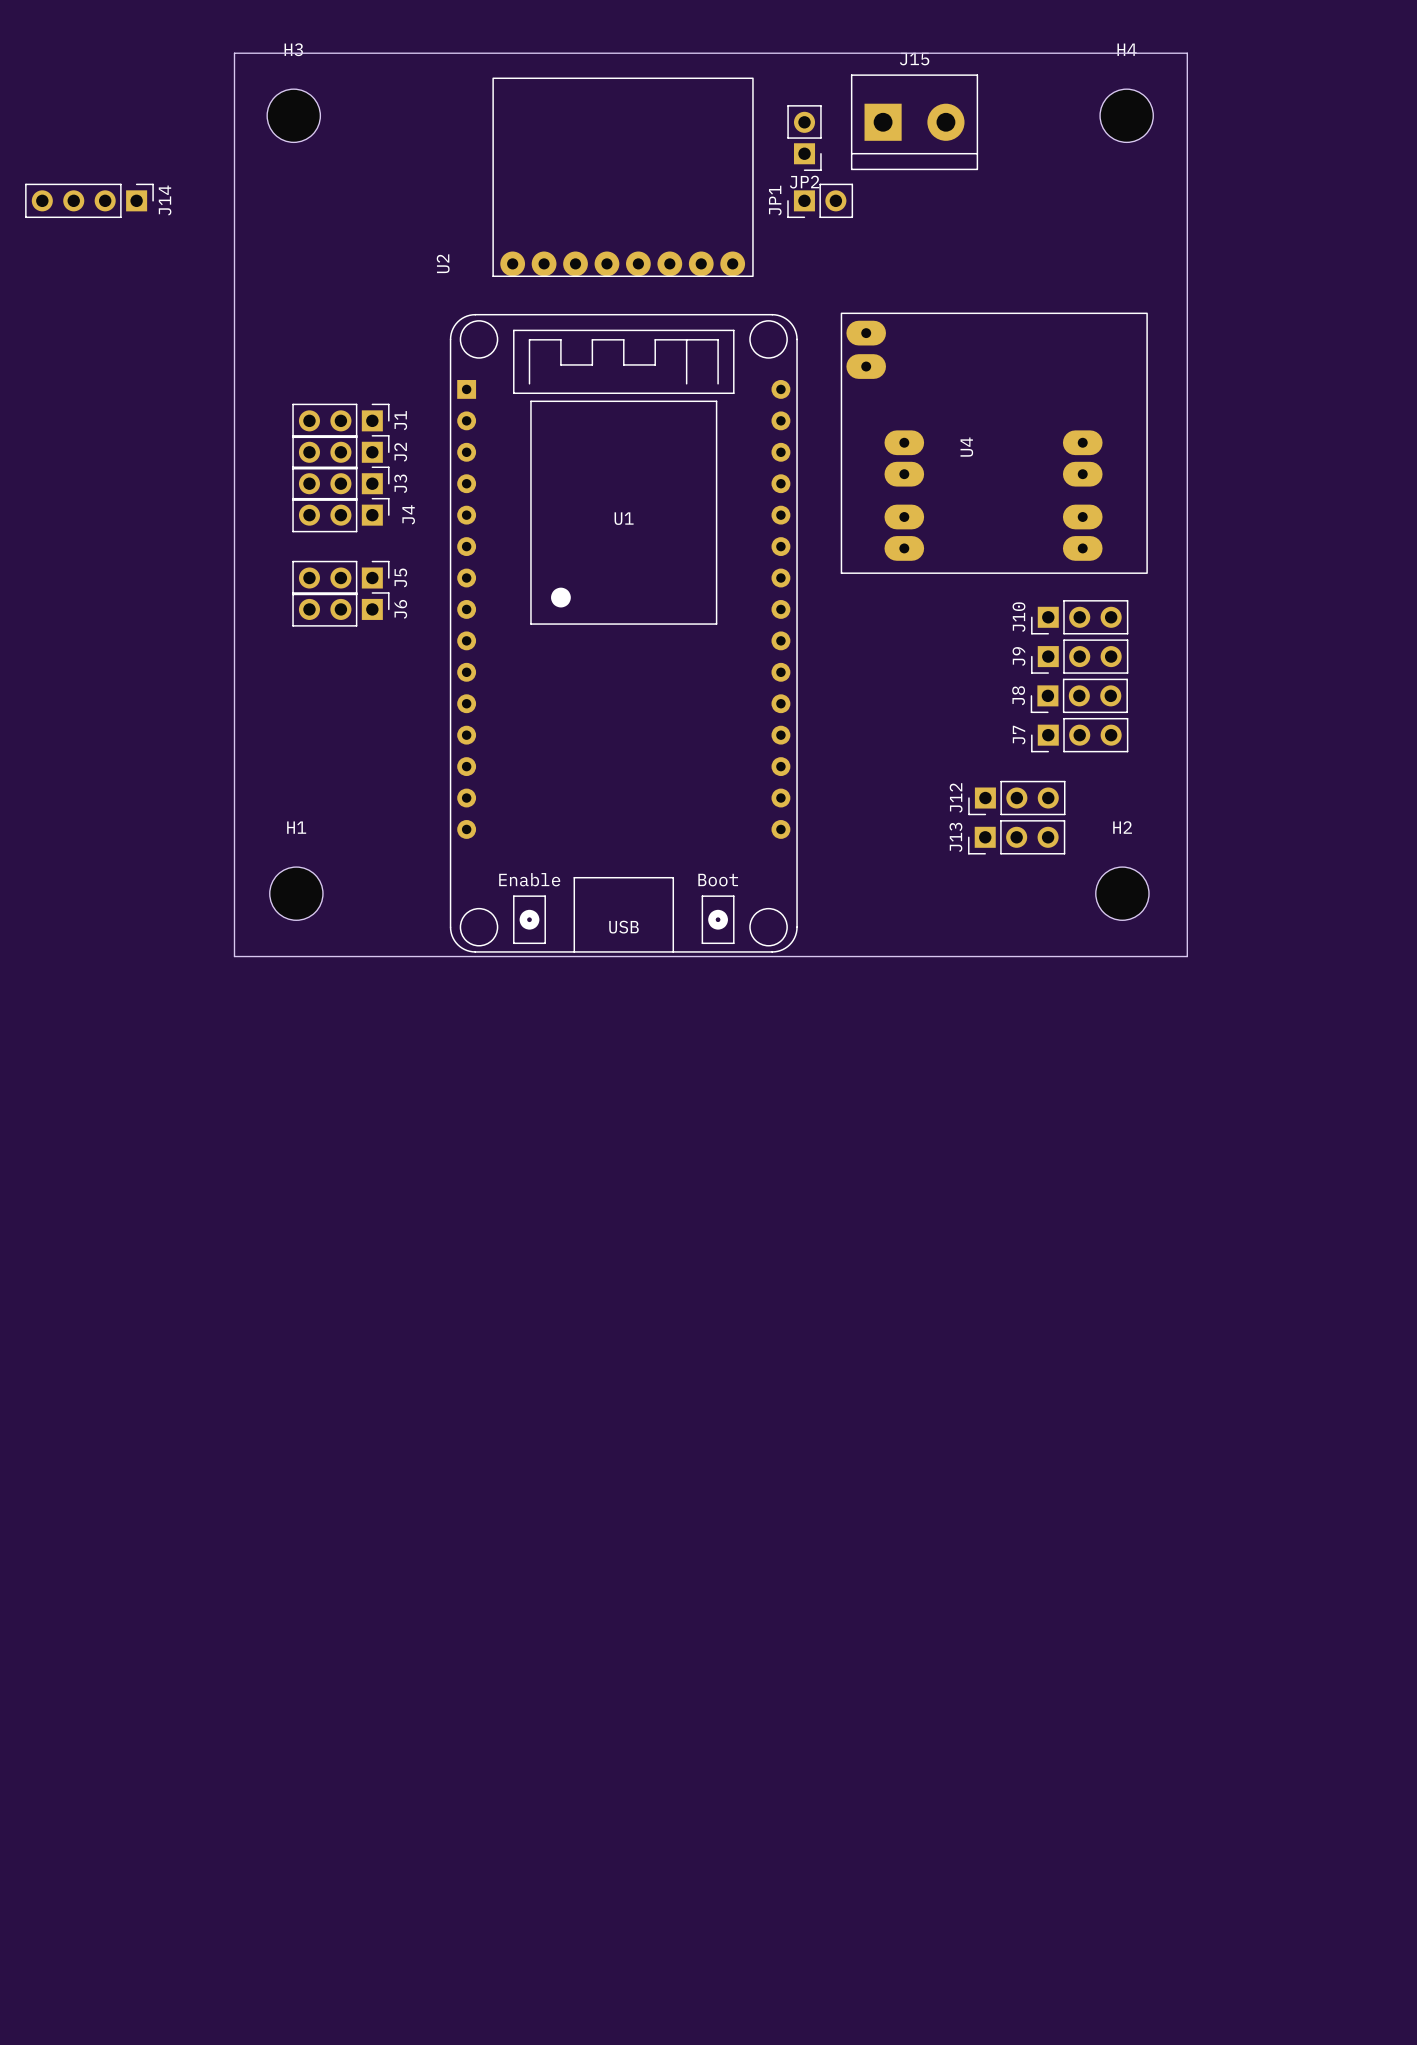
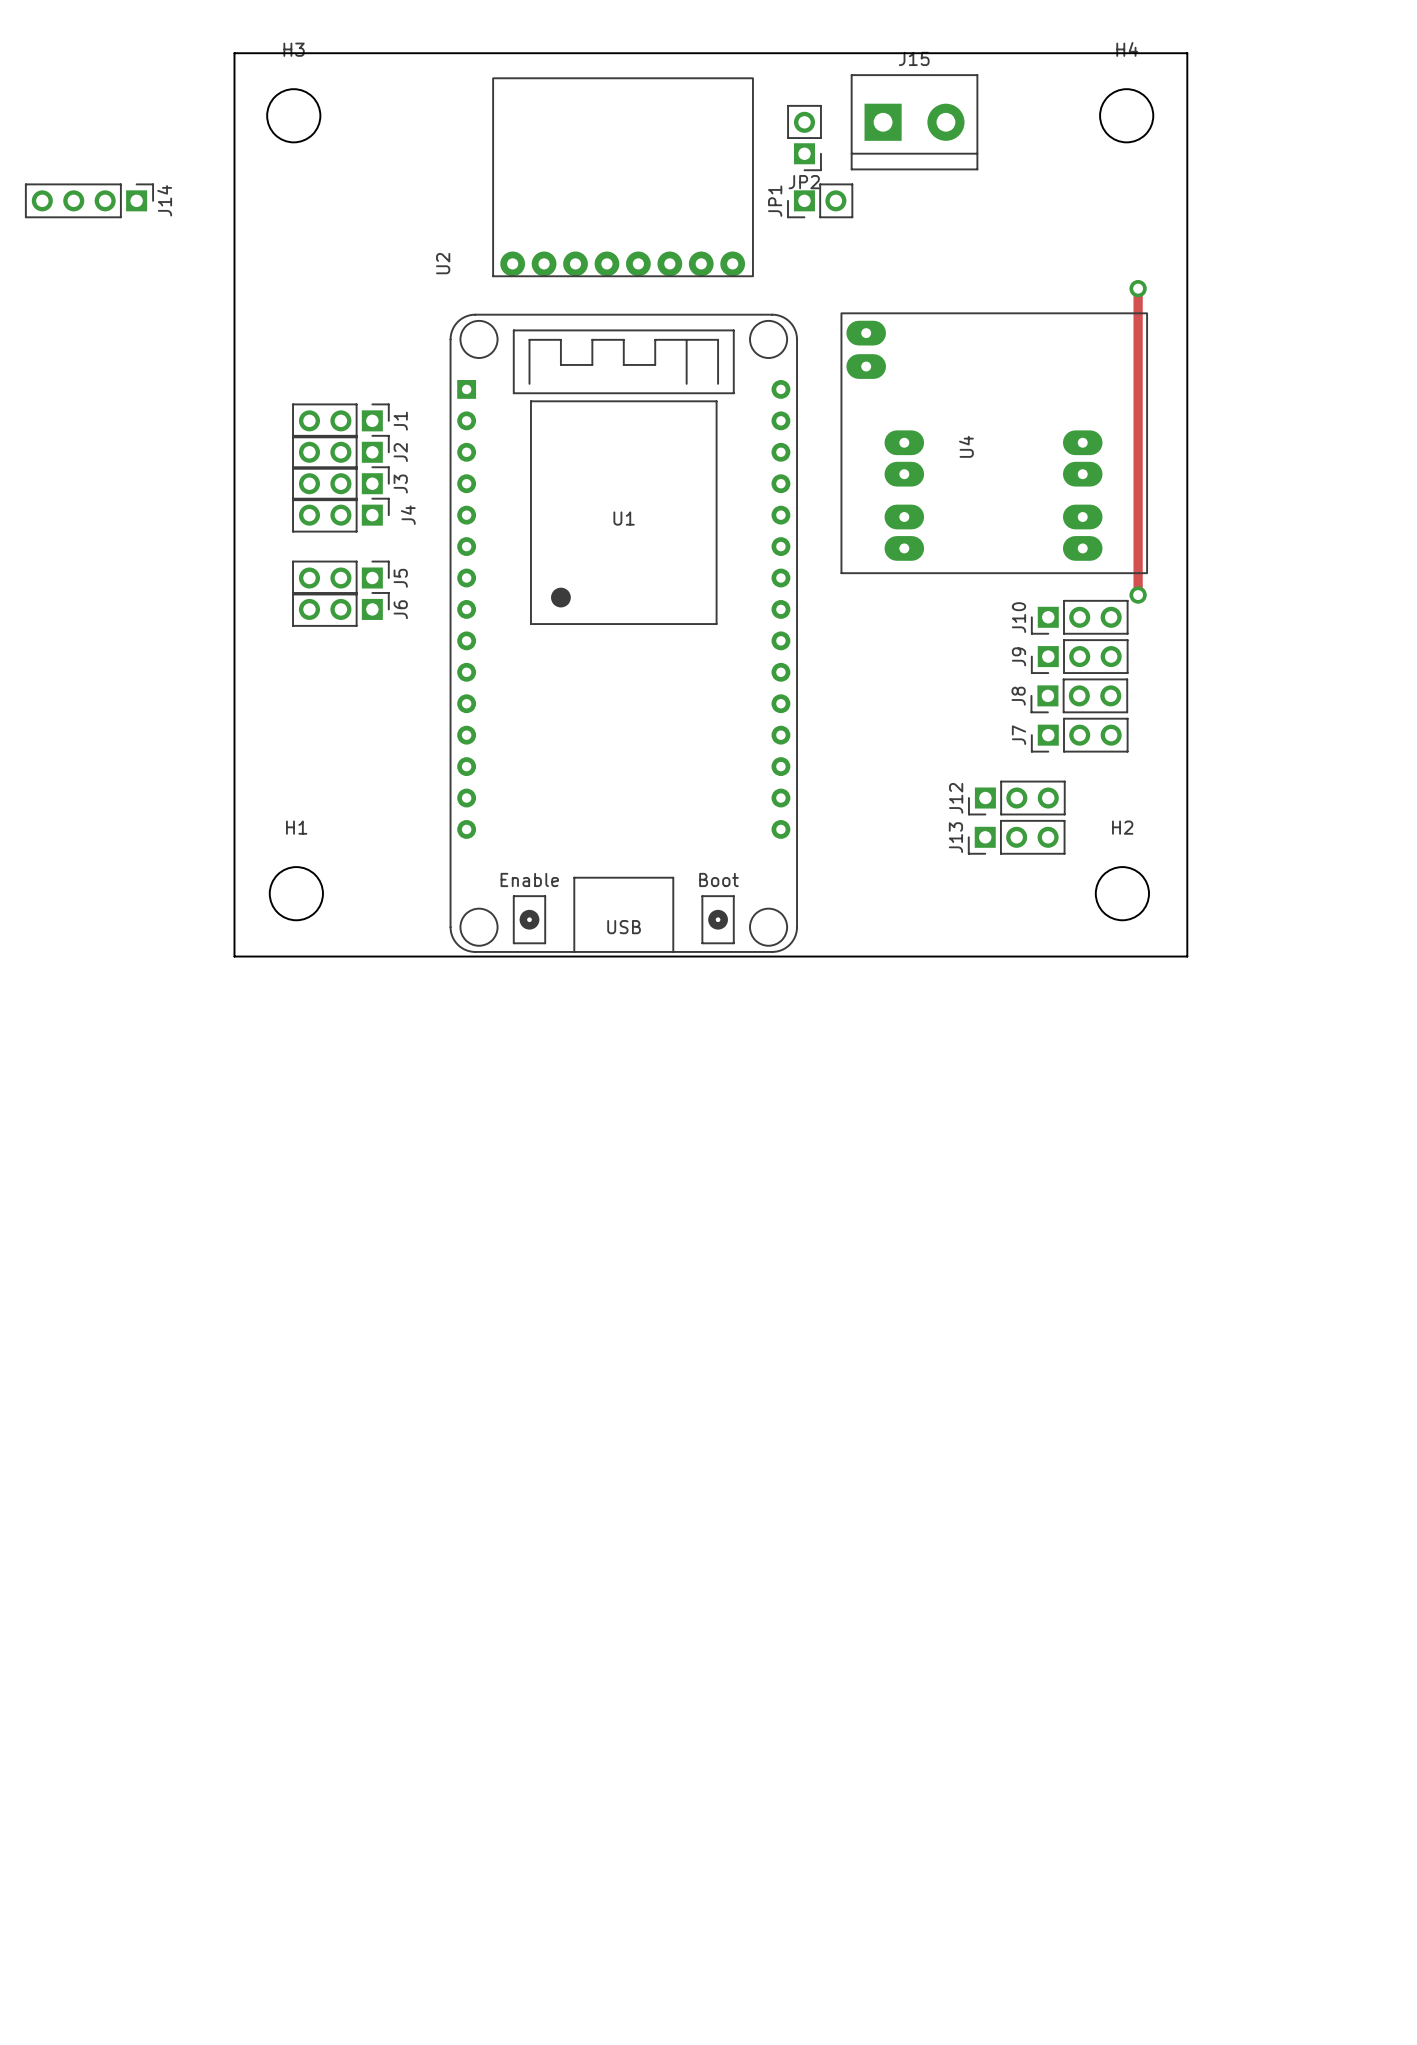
track: none -> (1138, 288) (1138, 595)
via: none -> (1138, 288)
via: none -> (1138, 595)

